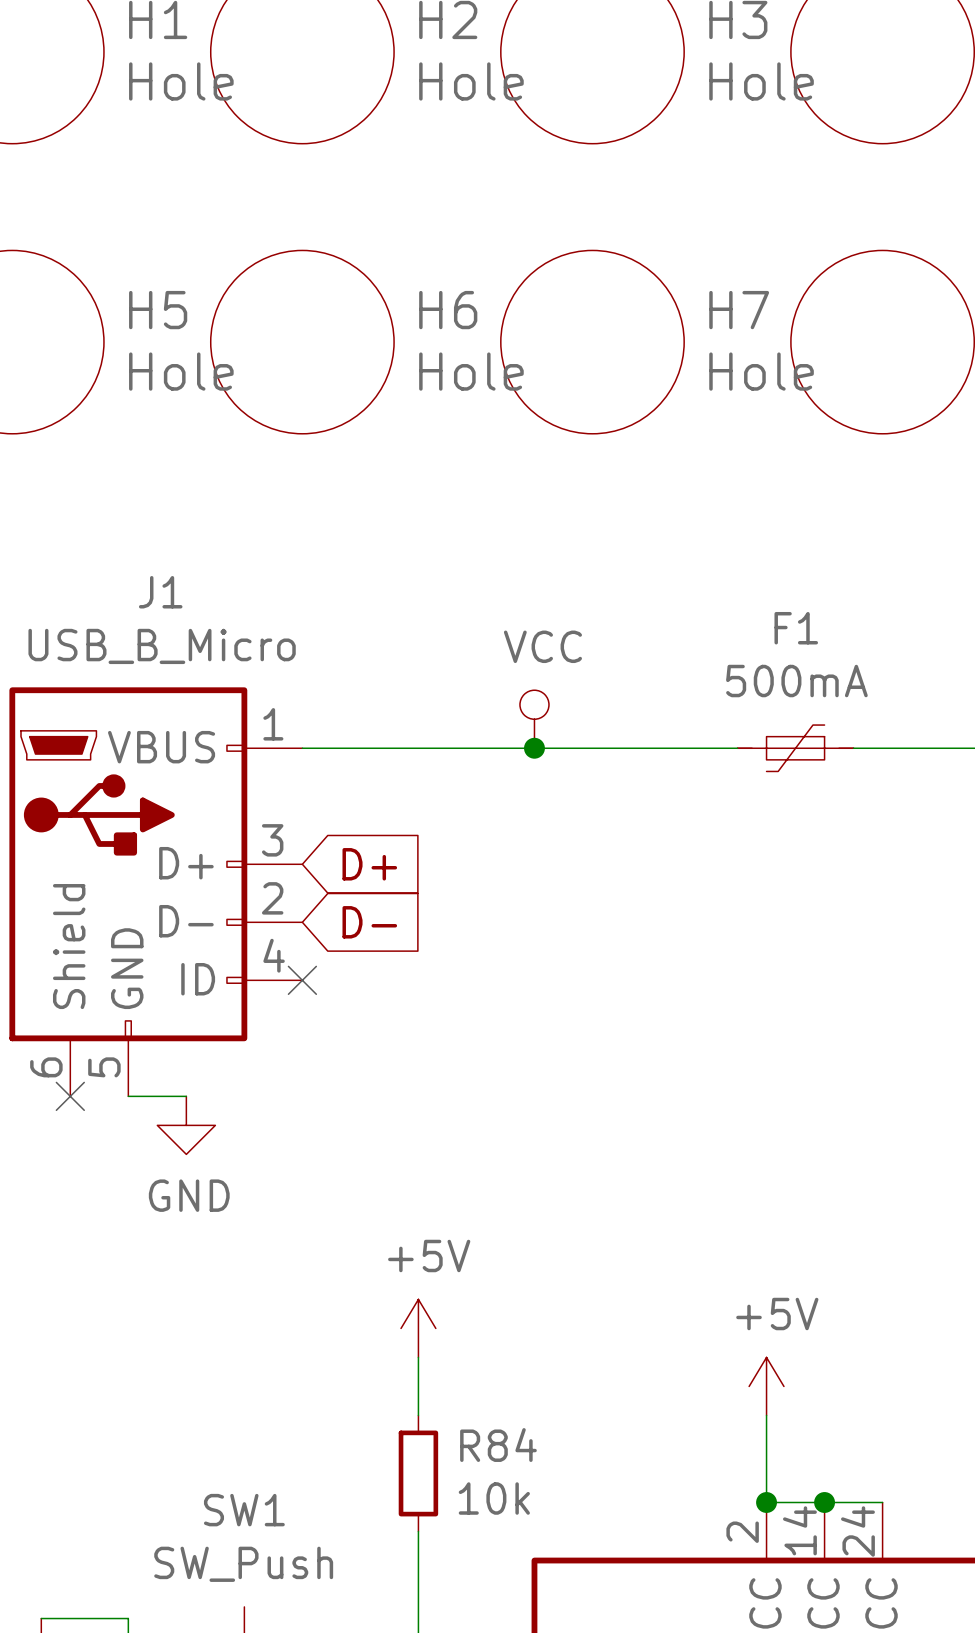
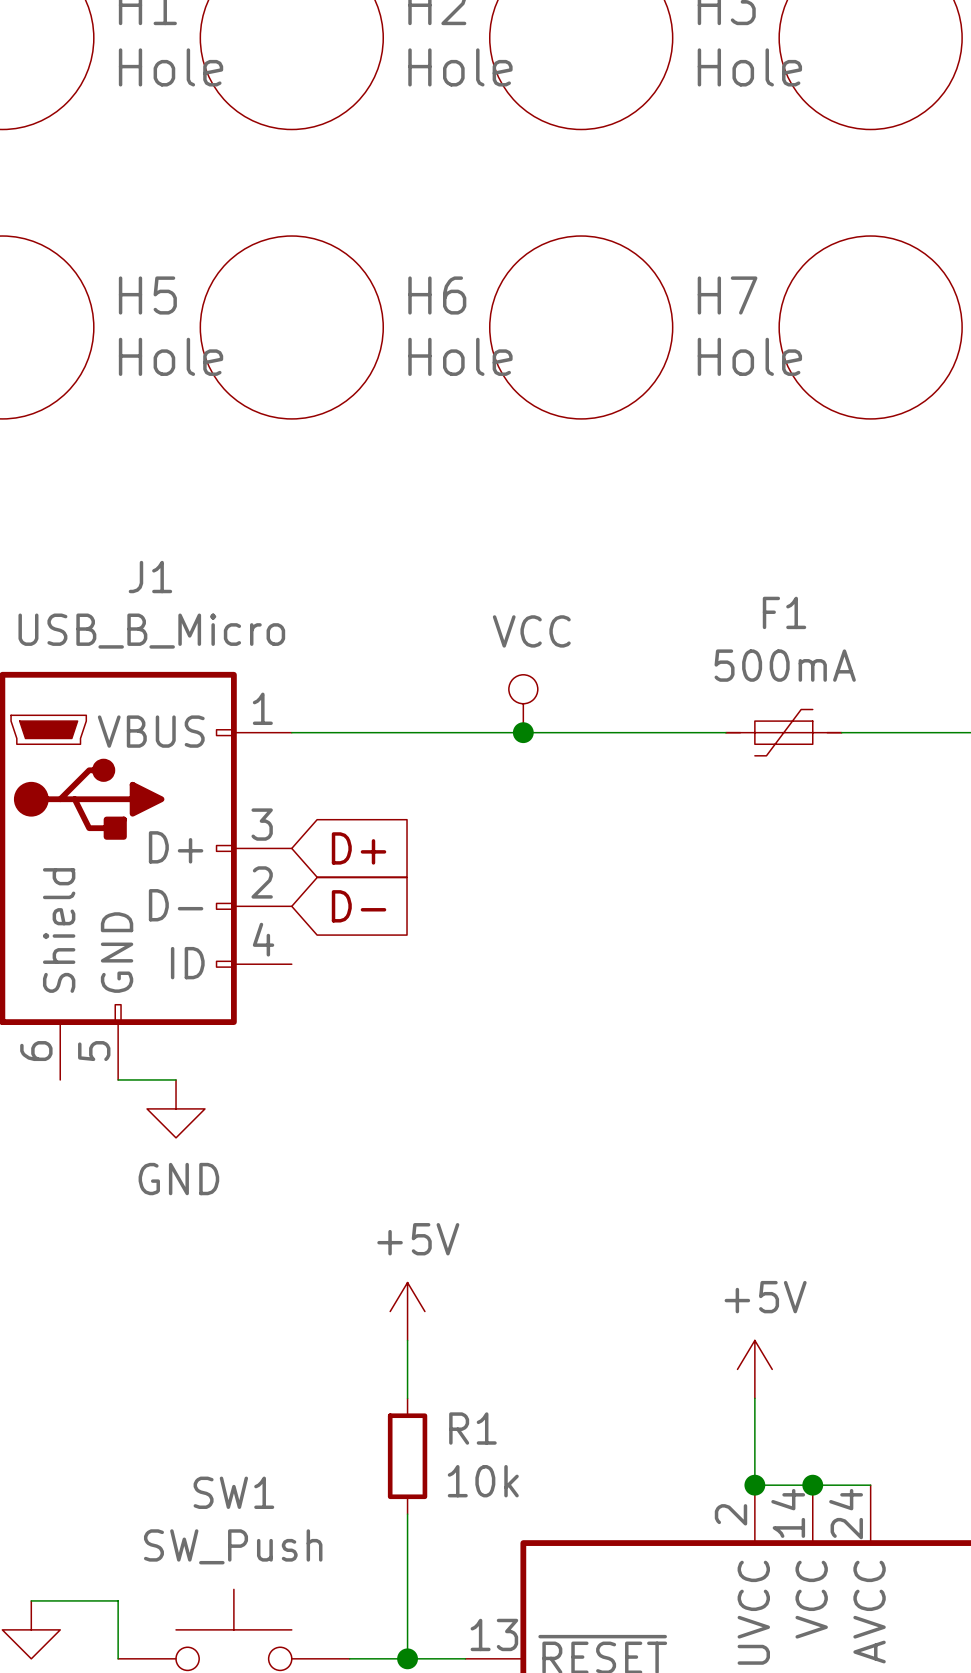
no-connect mark: (302, 980) -> none
no-connect mark: (70, 1096) -> none
R84 name: R84 (498, 1445) -> R1 (472, 1428)

